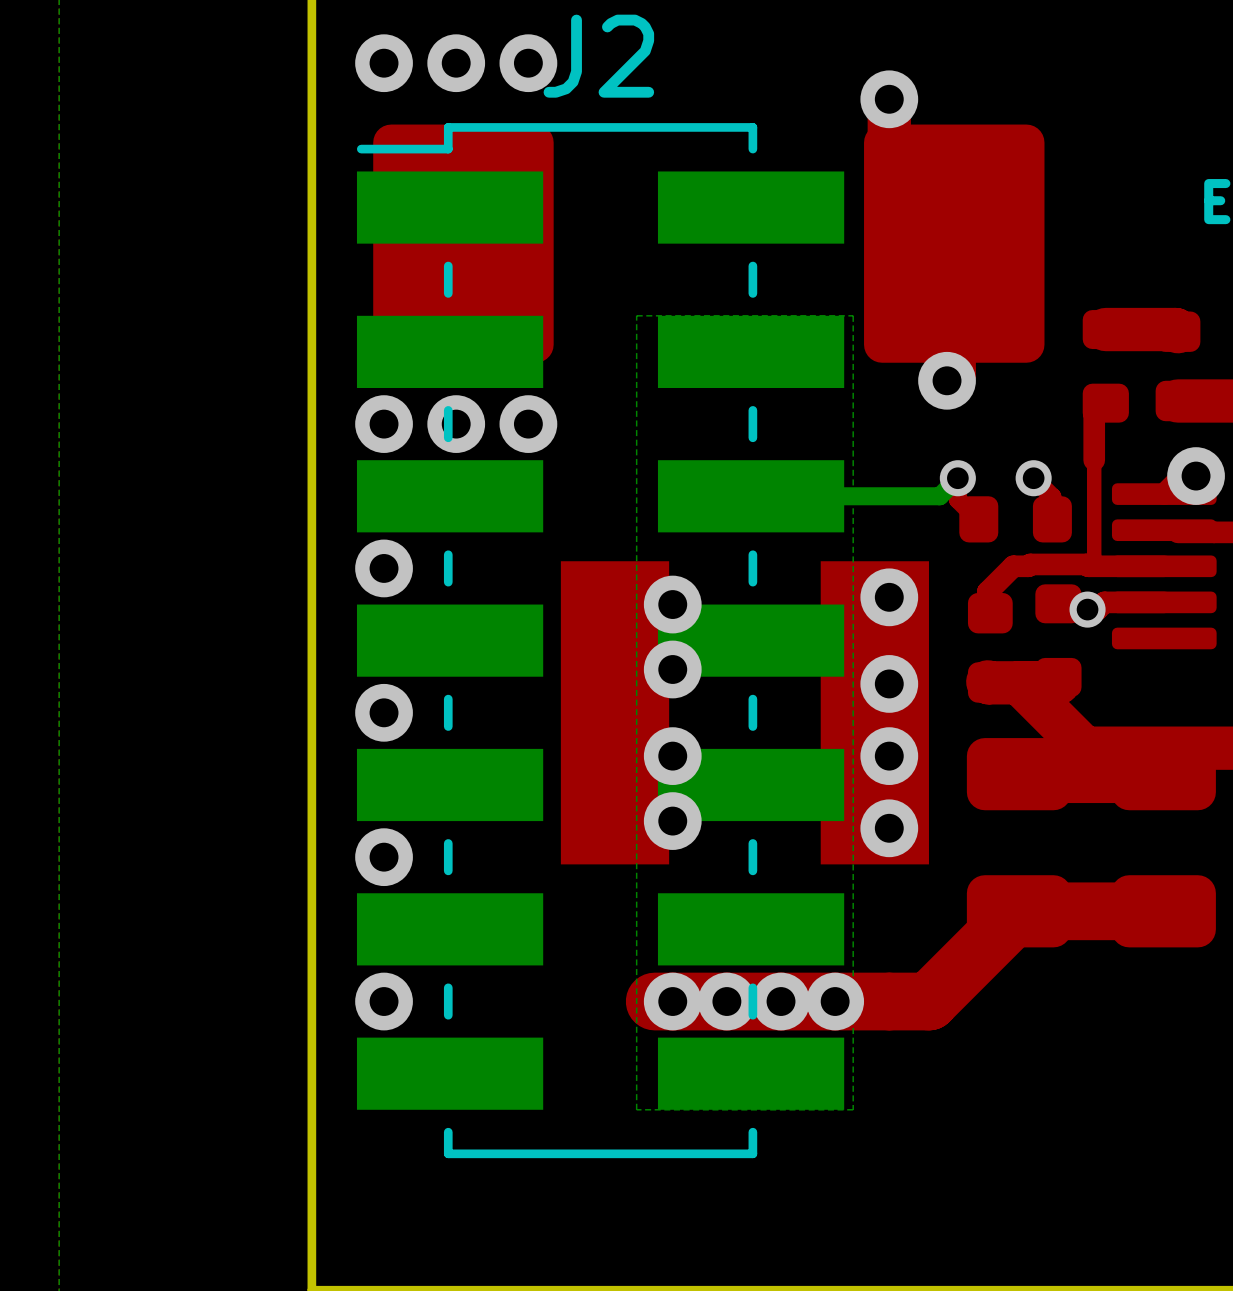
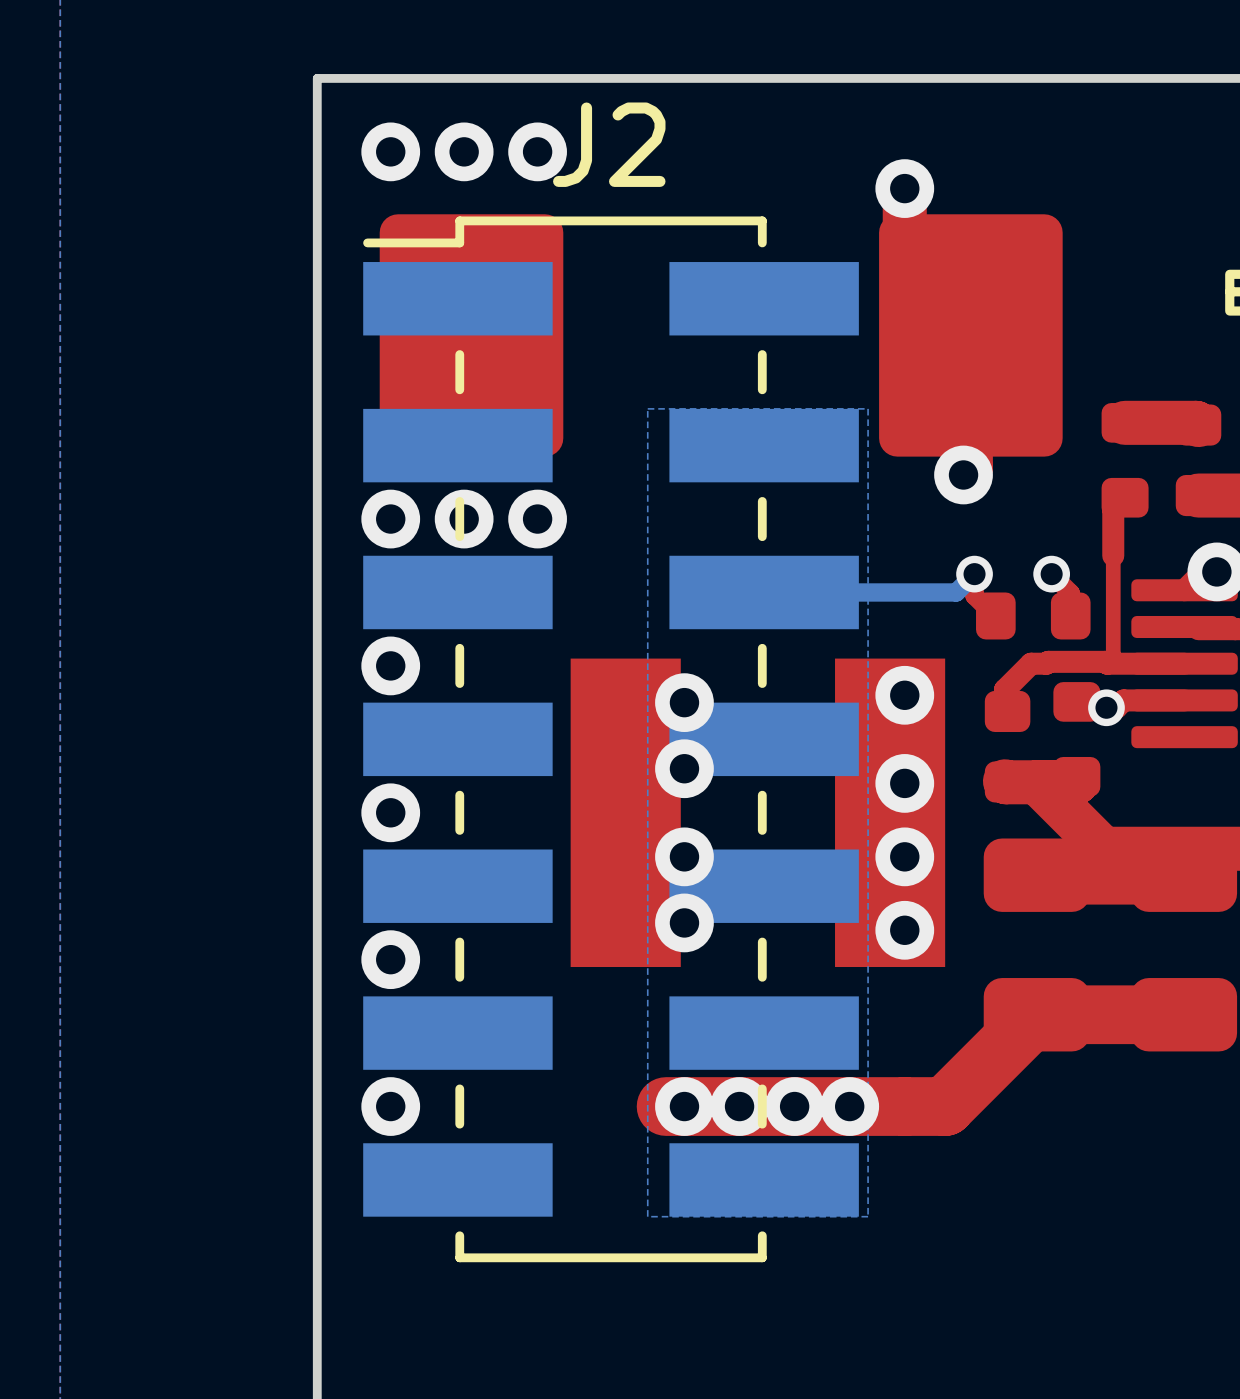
J2 footprint: [356, 123, 845, 1159] -> [363, 216, 859, 1263]

